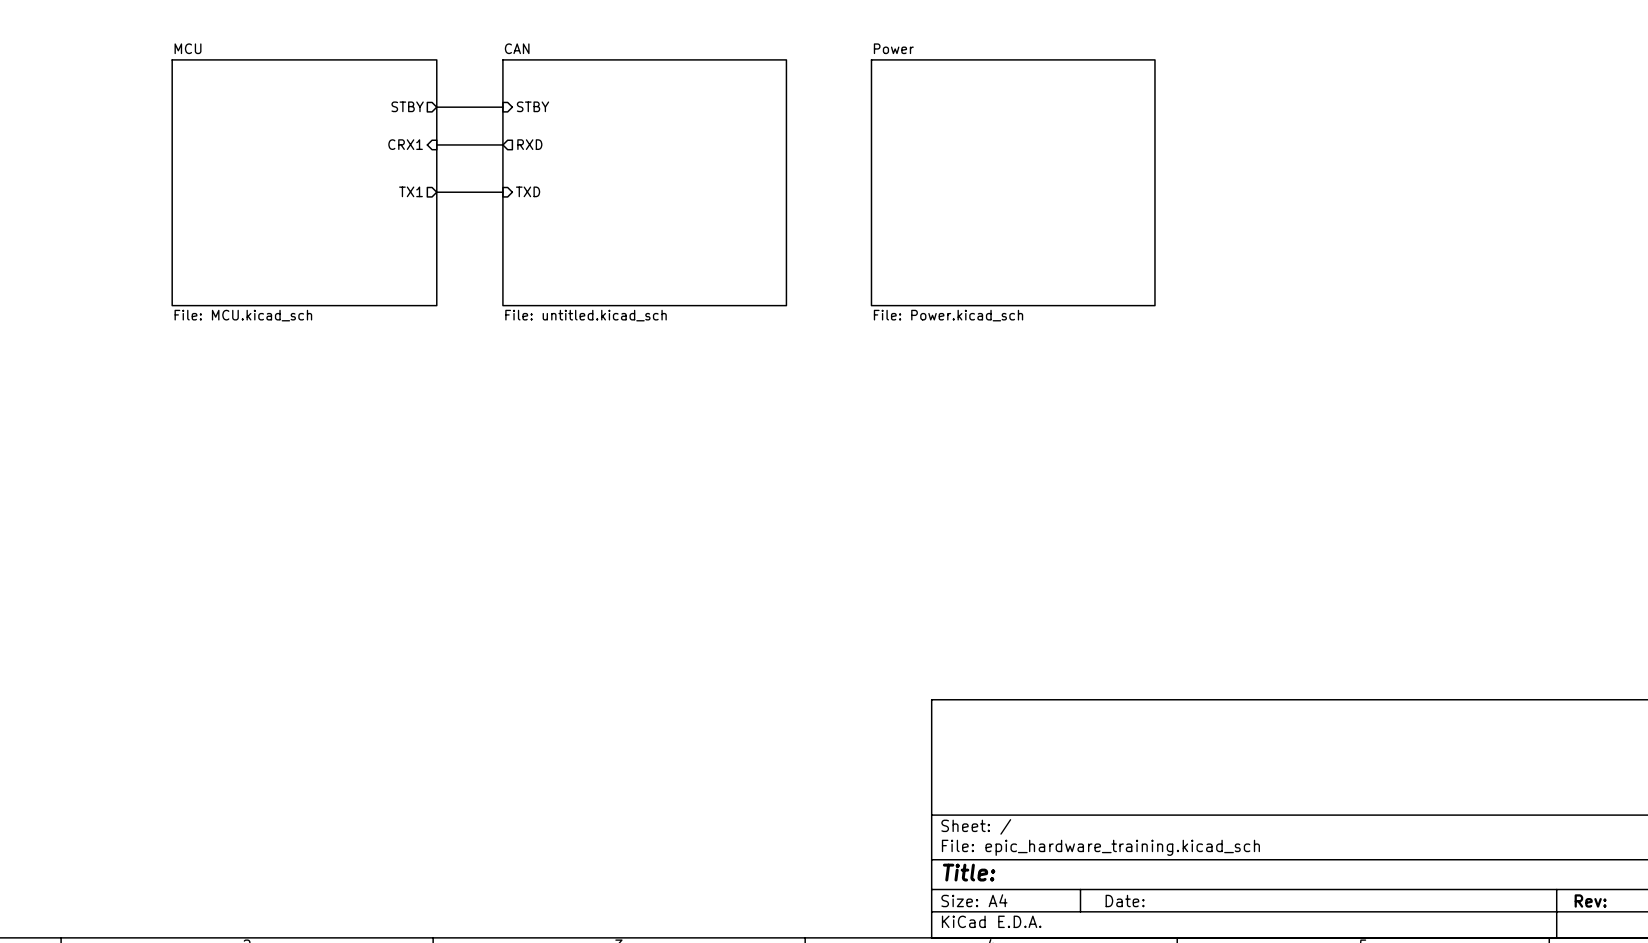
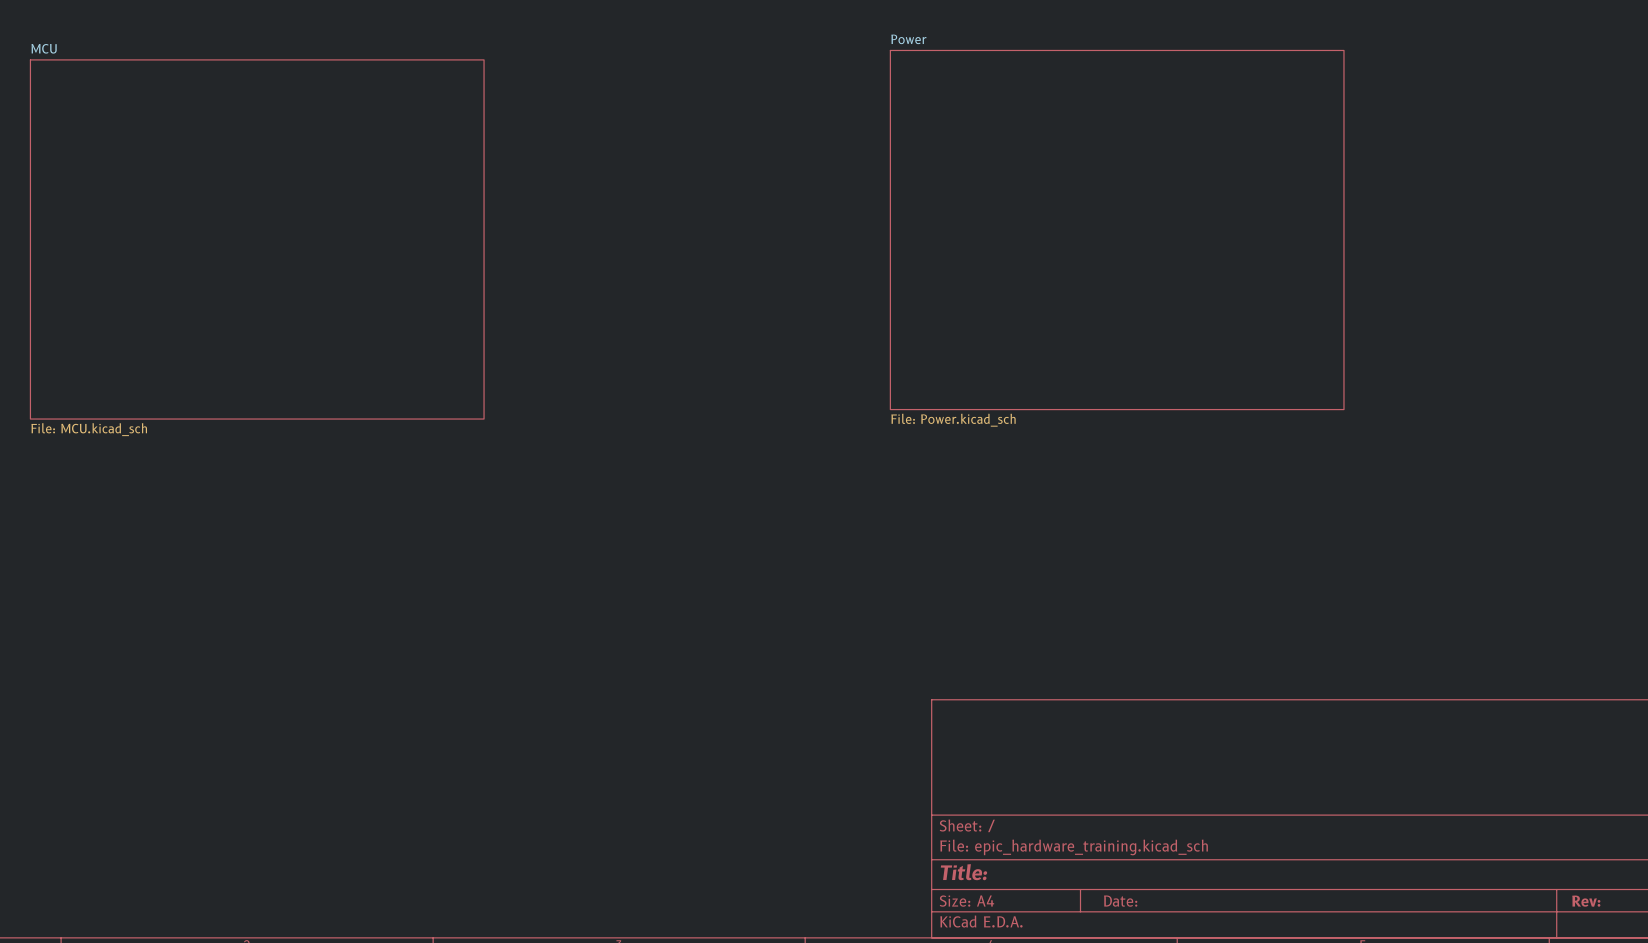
sheet pin: STBY (407, 106) -> none
sheet pin: STBY (533, 106) -> none
wire: (436, 107) (502, 107) -> none
sheet pin: CRX1 (405, 144) -> none
wire: (436, 144) (502, 144) -> none
sheet pin: RXD (529, 144) -> none
sheet MCU: File: MCU.kicad_sch (304, 182) -> none
sheet CAN: File: untitled.kicad_sch (644, 182) -> none
sheet Power: File: Power.kicad_sch (1013, 182) -> none
sheet pin: TX1 (410, 191) -> none
sheet pin: TXD (528, 191) -> none
wire: (436, 192) (502, 192) -> none
sheet Power: none -> File: Power.kicad_sch (1117, 230)
sheet MCU: none -> File: MCU.kicad_sch (257, 239)

